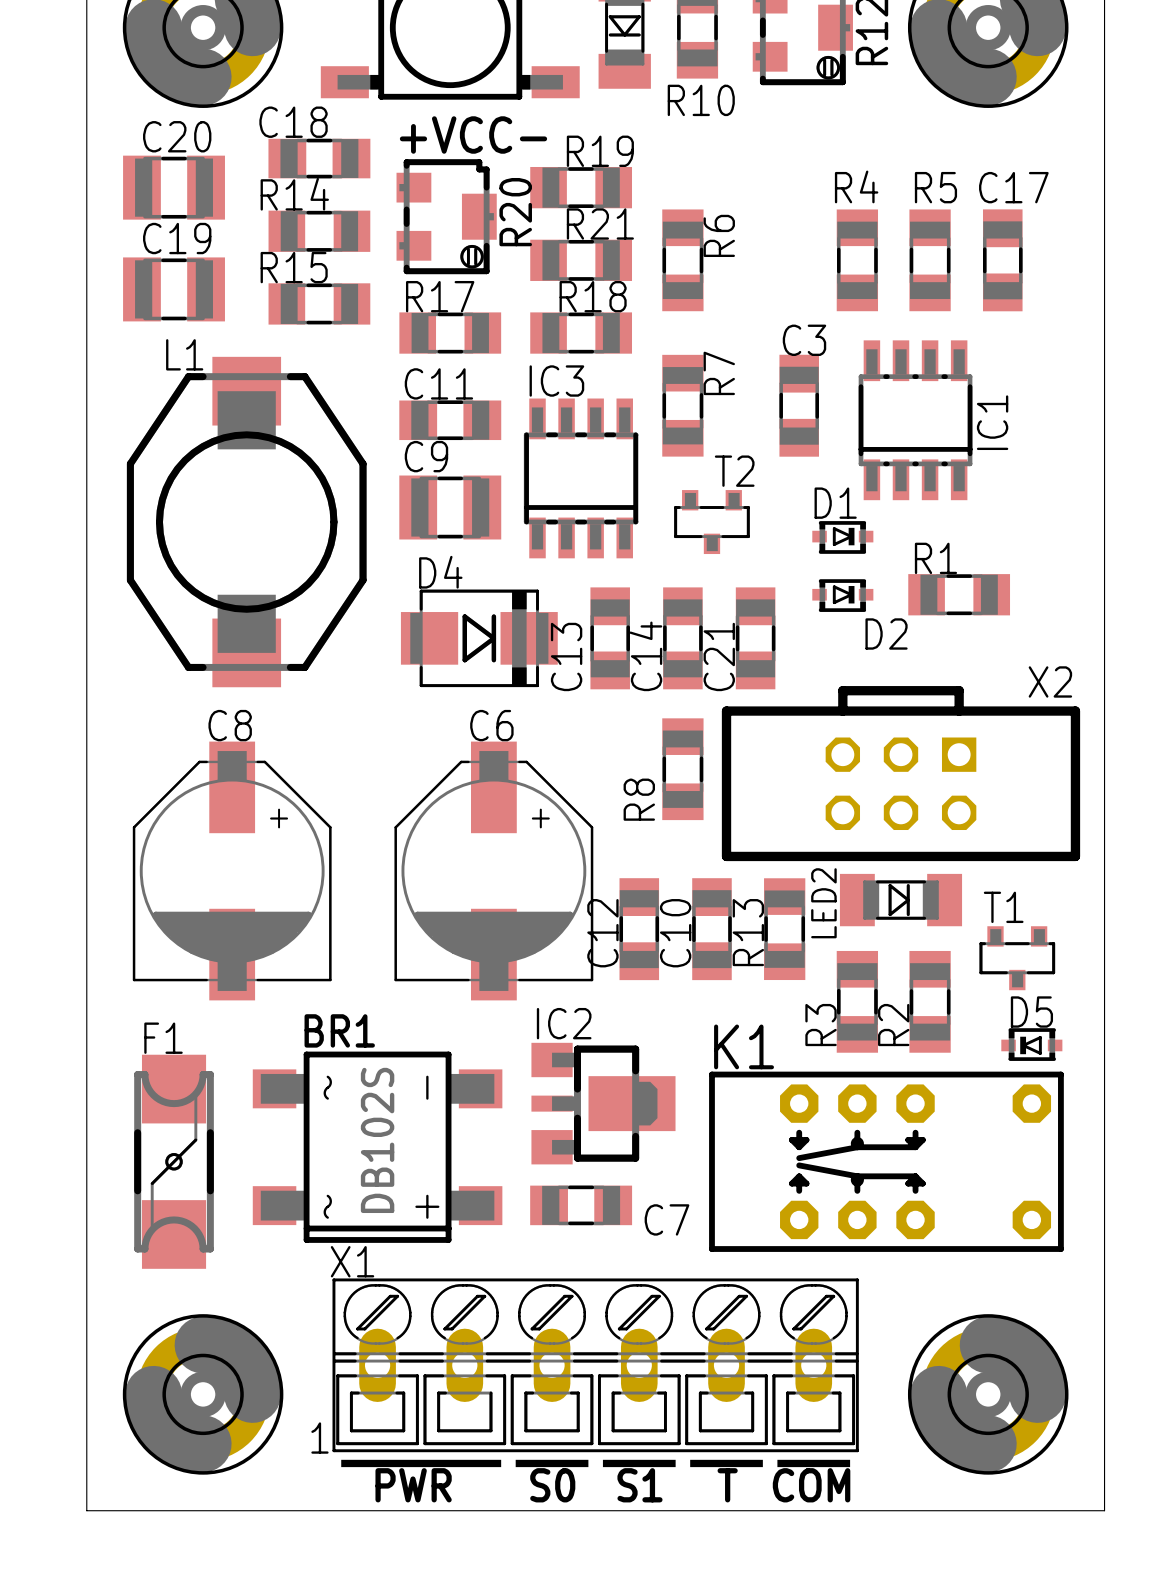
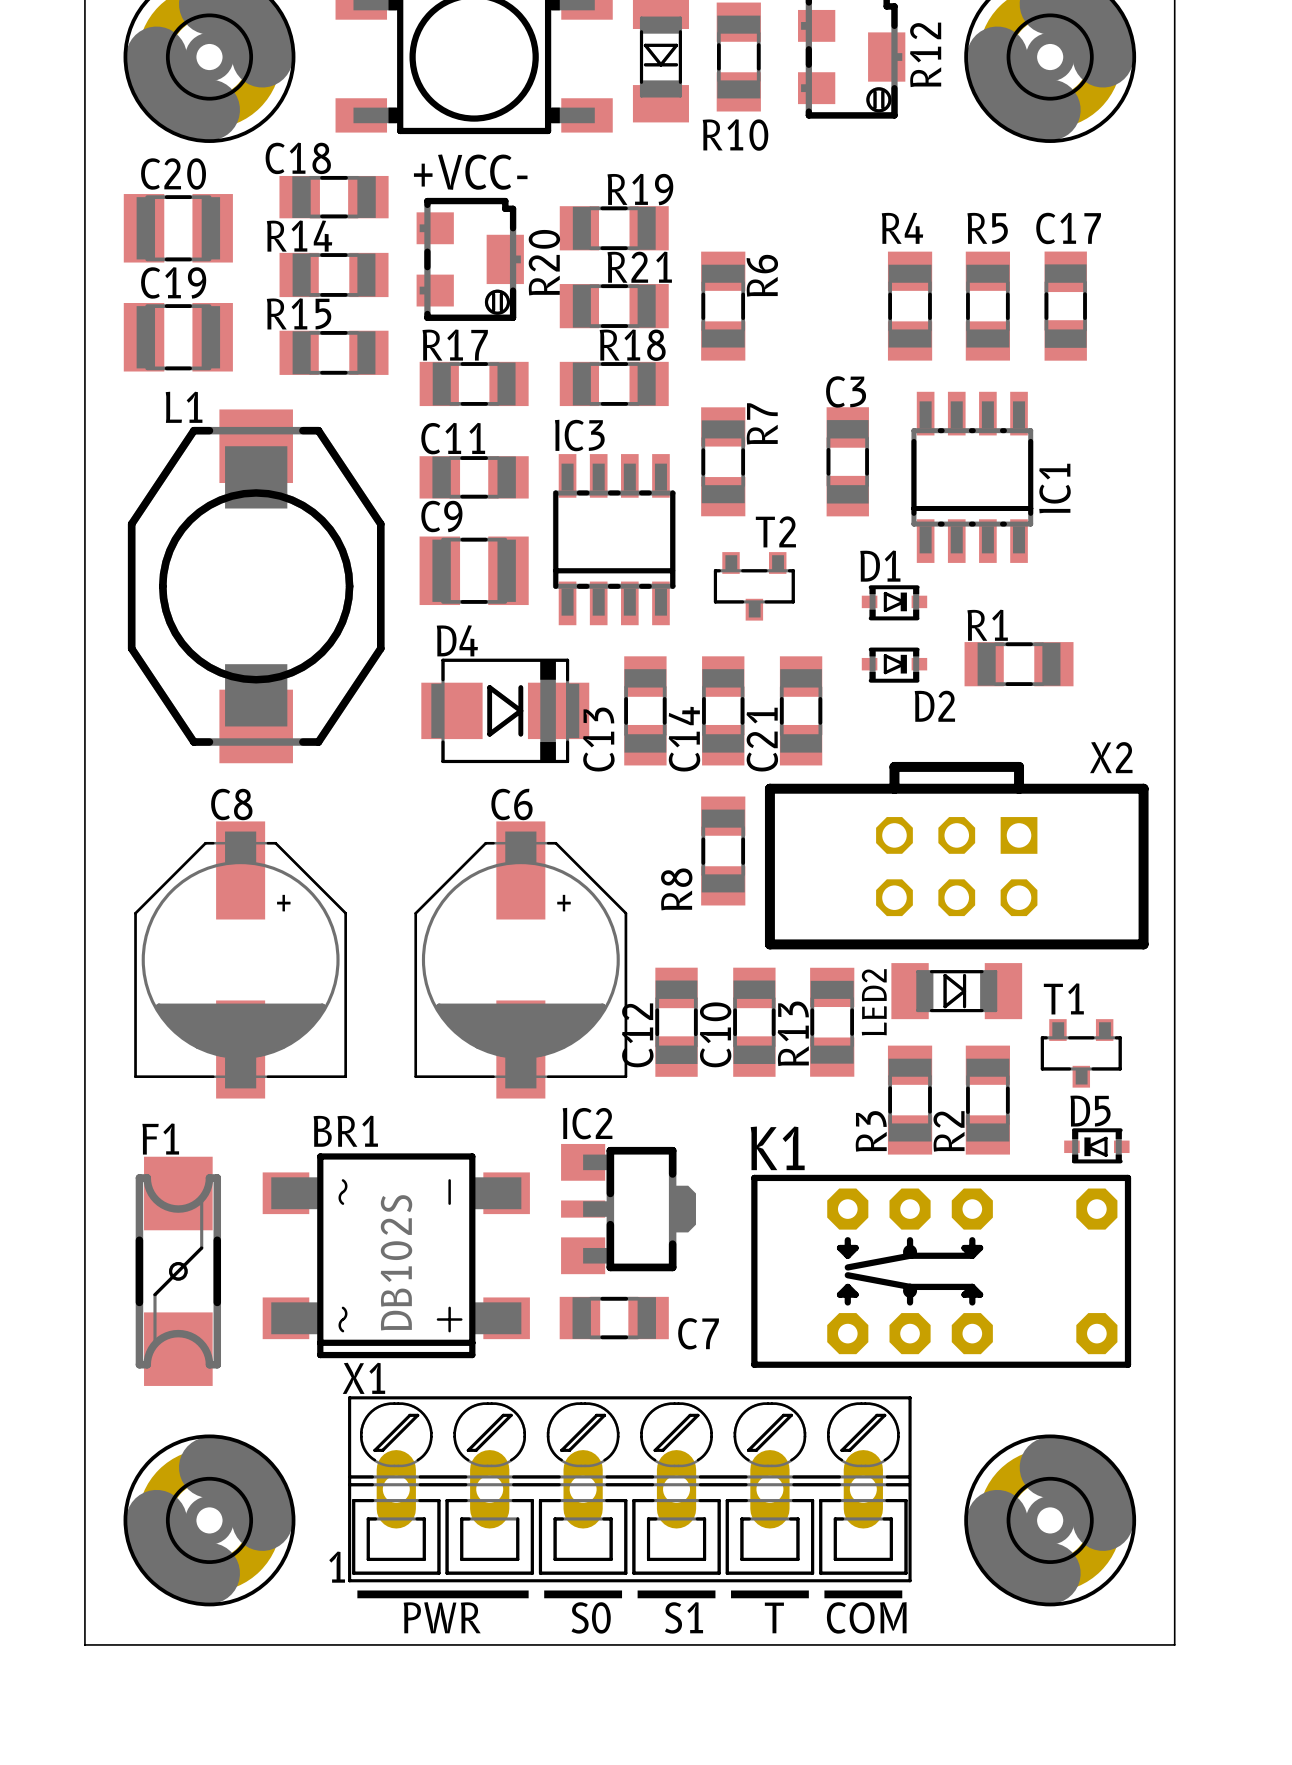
IC2 footprint: [531, 1042, 676, 1165] -> [561, 1143, 696, 1275]

